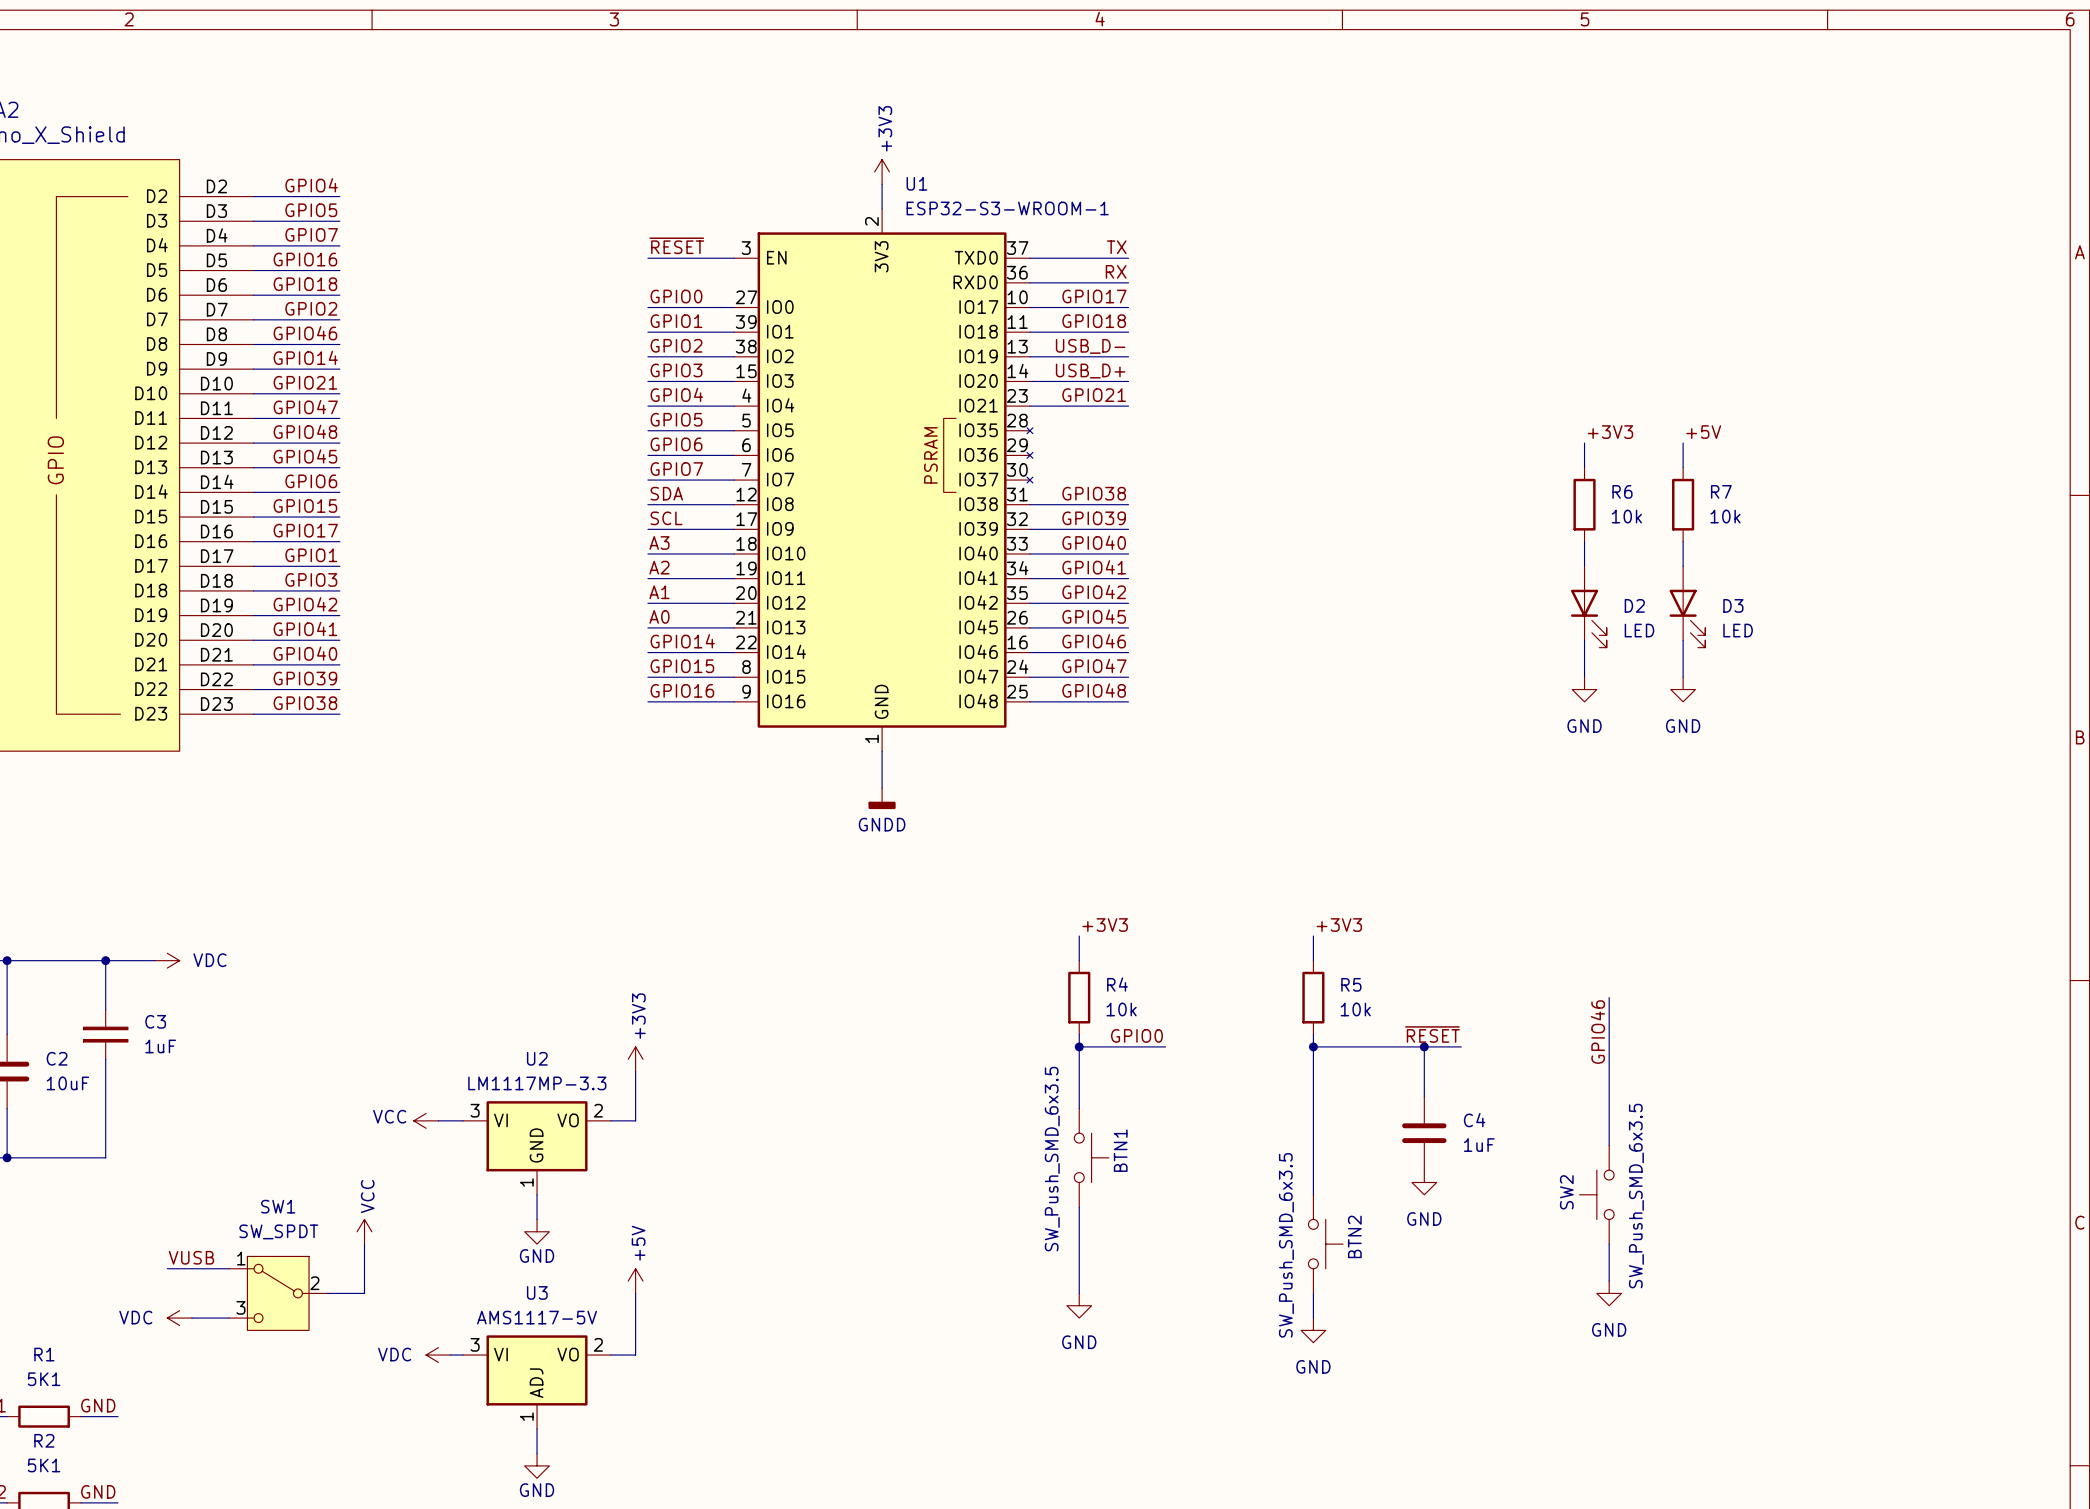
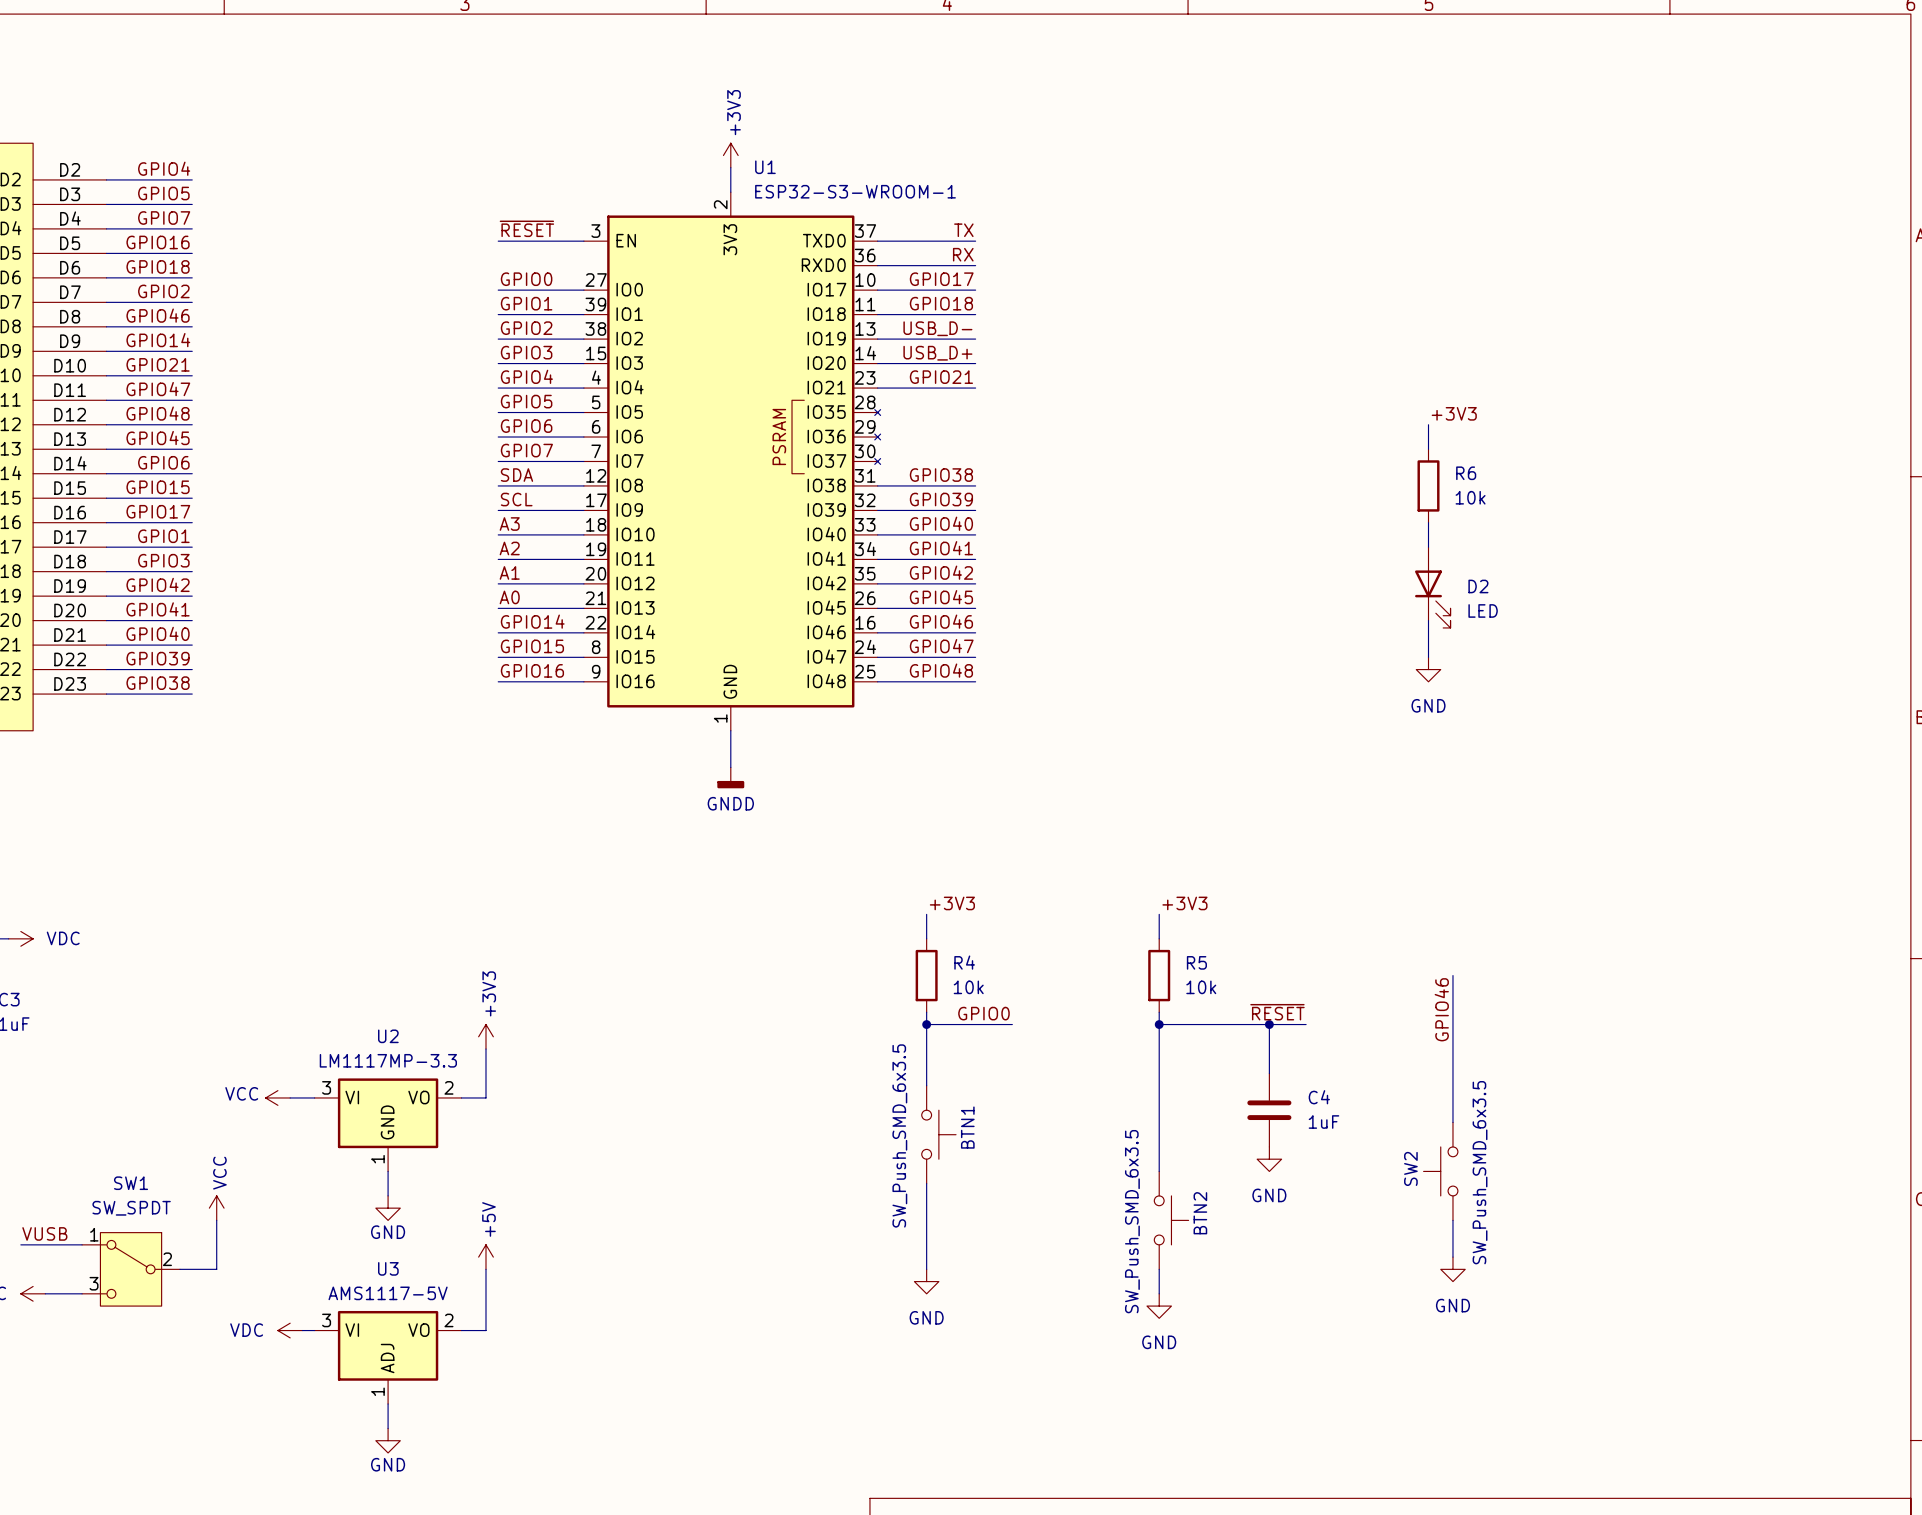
label: +5V (1703, 432) -> none
wire: (1683, 443) (1683, 467) -> none
R7: 10k (1683, 504) -> none
wire: (1683, 541) (1683, 566) -> none
D3: LED (1687, 606) -> none
wire: (1683, 640) (1683, 677) -> none
power symbol: GND (1683, 689) -> none

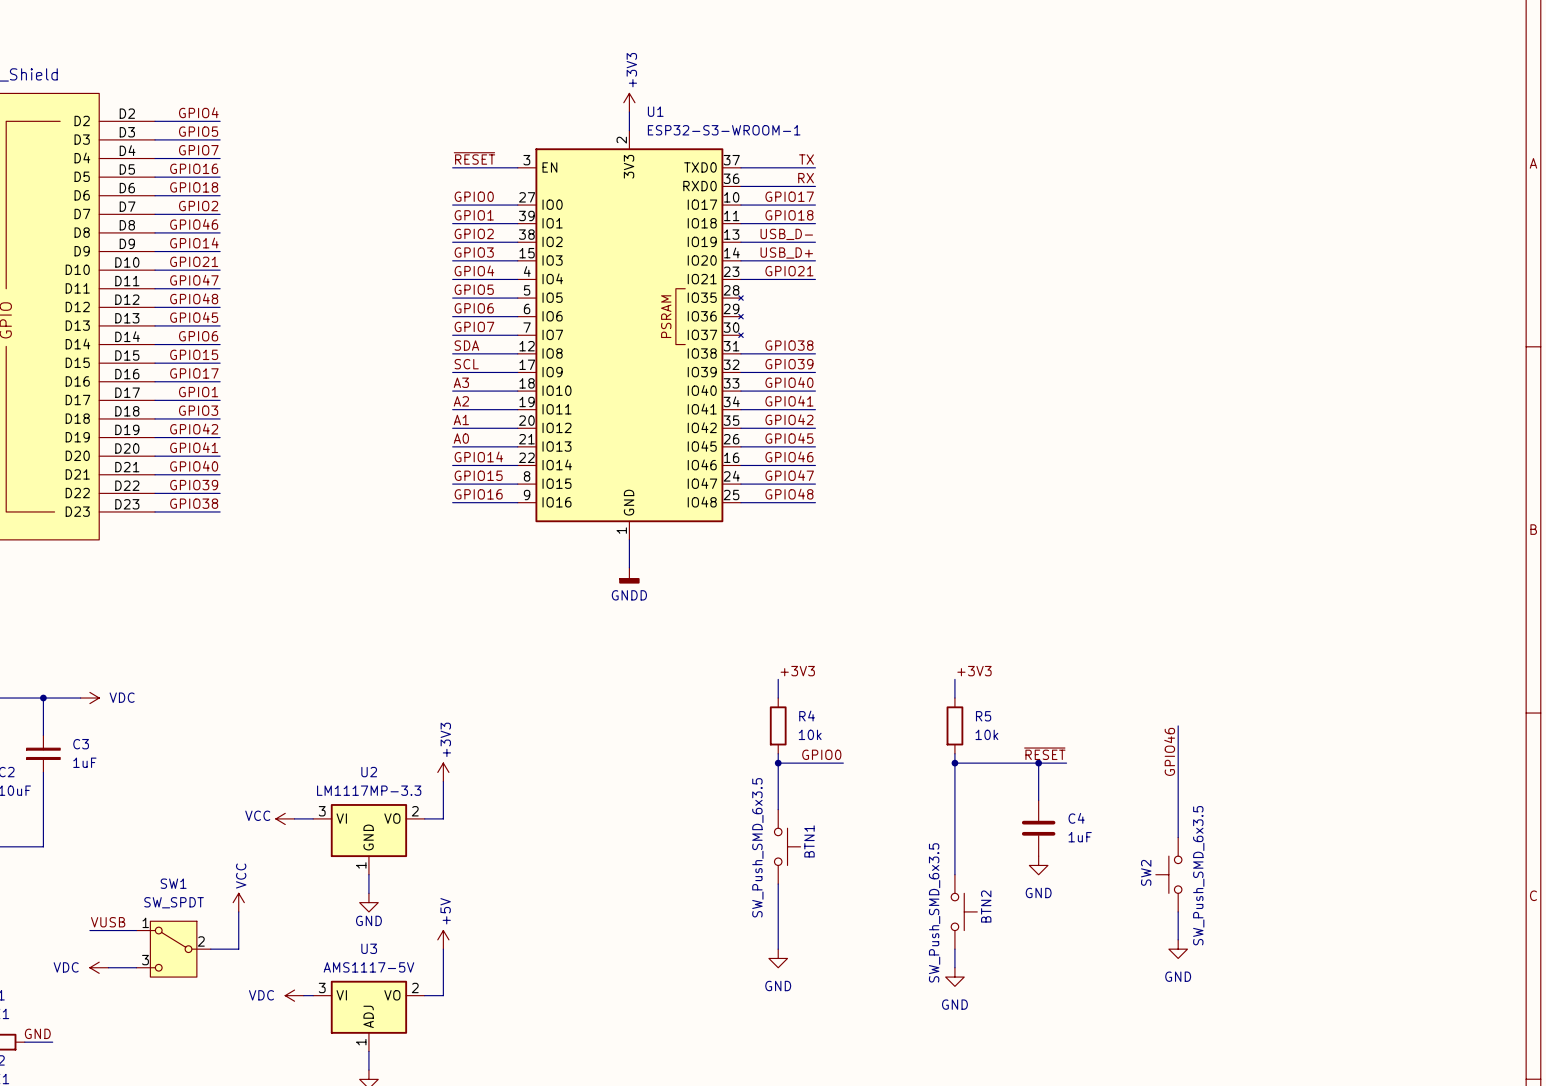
label: +3V3 (1454, 413) -> none
wire: (1428, 424) (1428, 449) -> none
R6: 10k (1428, 485) -> none
wire: (1428, 522) (1428, 547) -> none
D2: LED (1432, 587) -> none
wire: (1428, 620) (1428, 657) -> none
power symbol: GND (1428, 669) -> none

